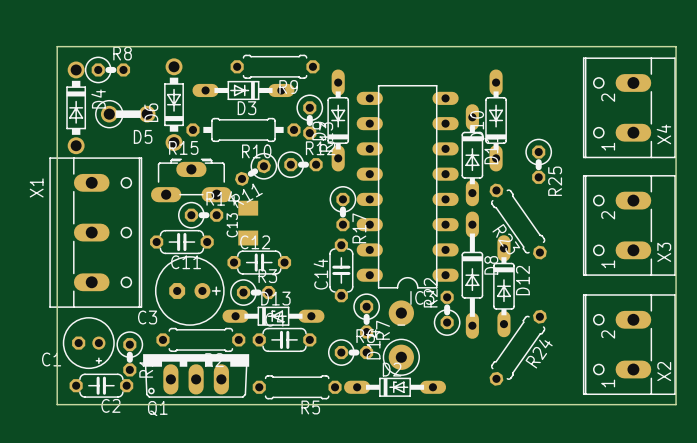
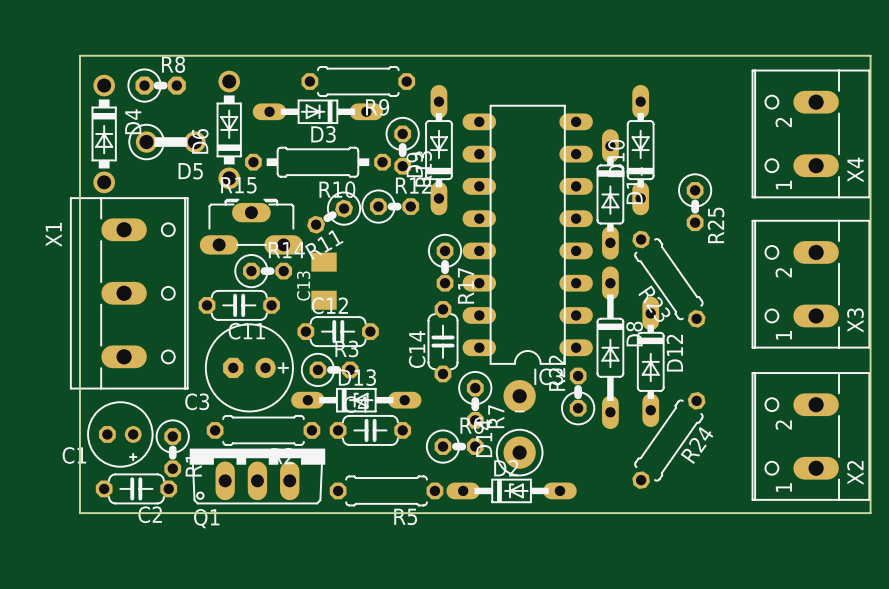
R8 footprint: [84, 56, 131, 84] -> [127, 68, 186, 103]

